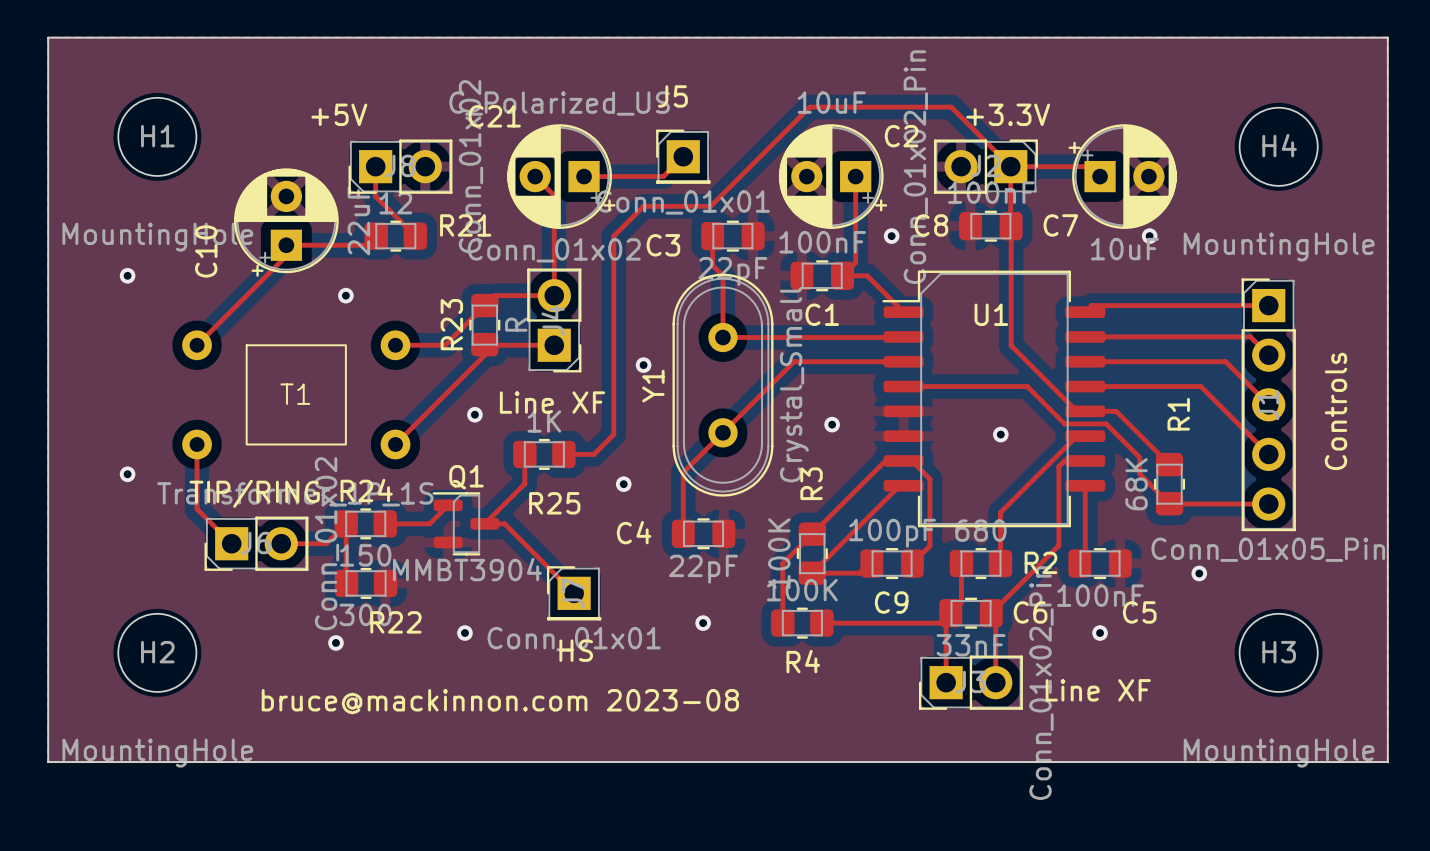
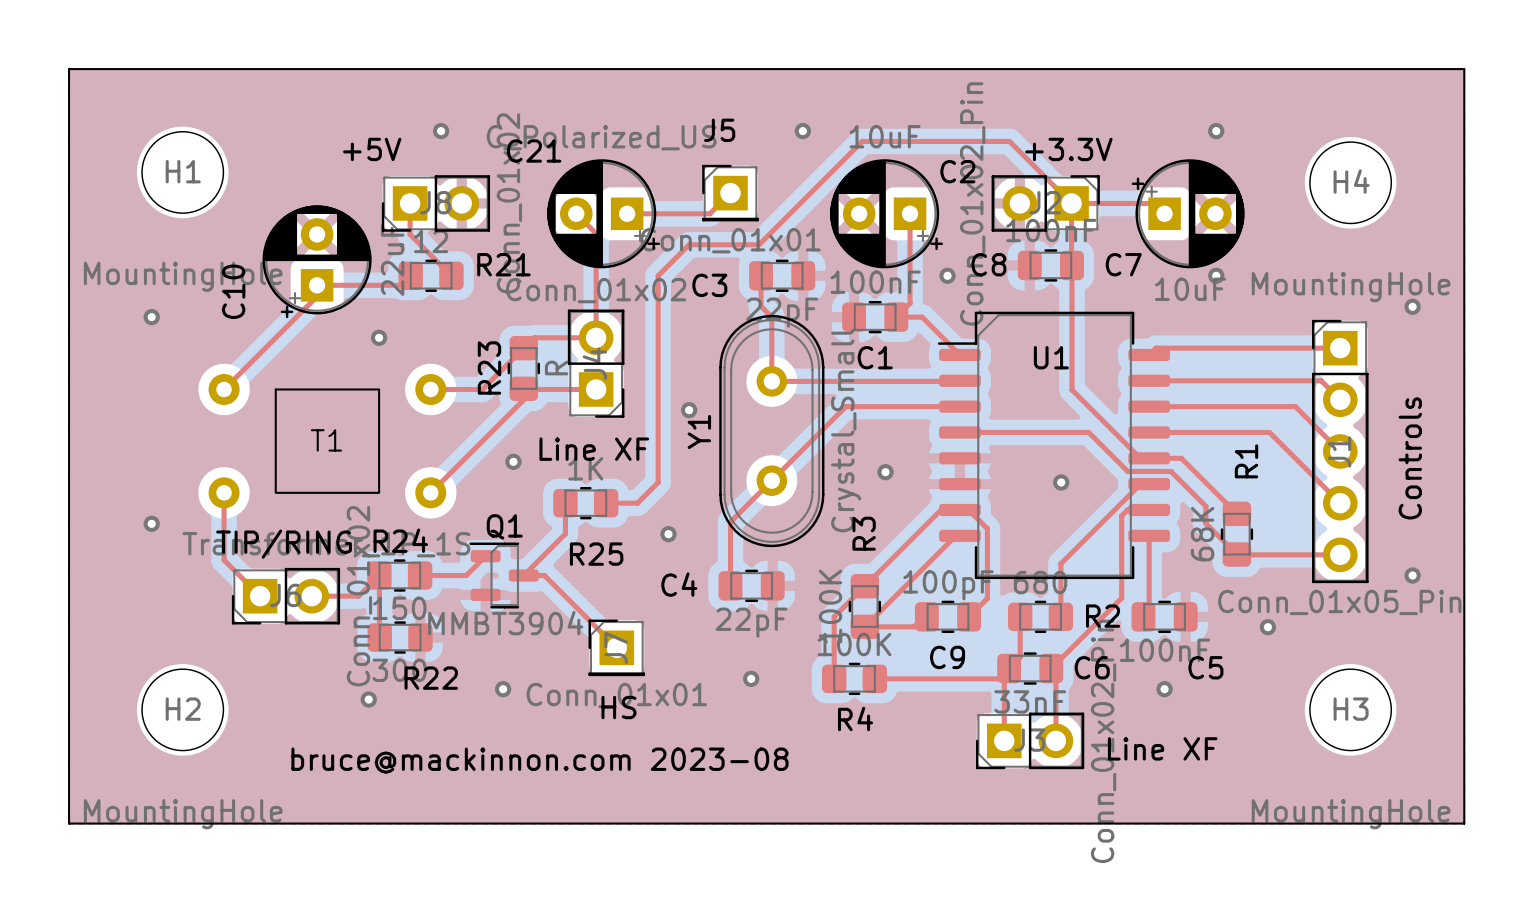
via: none -> (441, 131)
via: none -> (802, 131)
via: none -> (1216, 131)
via: none -> (1412, 306)
via: none -> (1412, 575)

